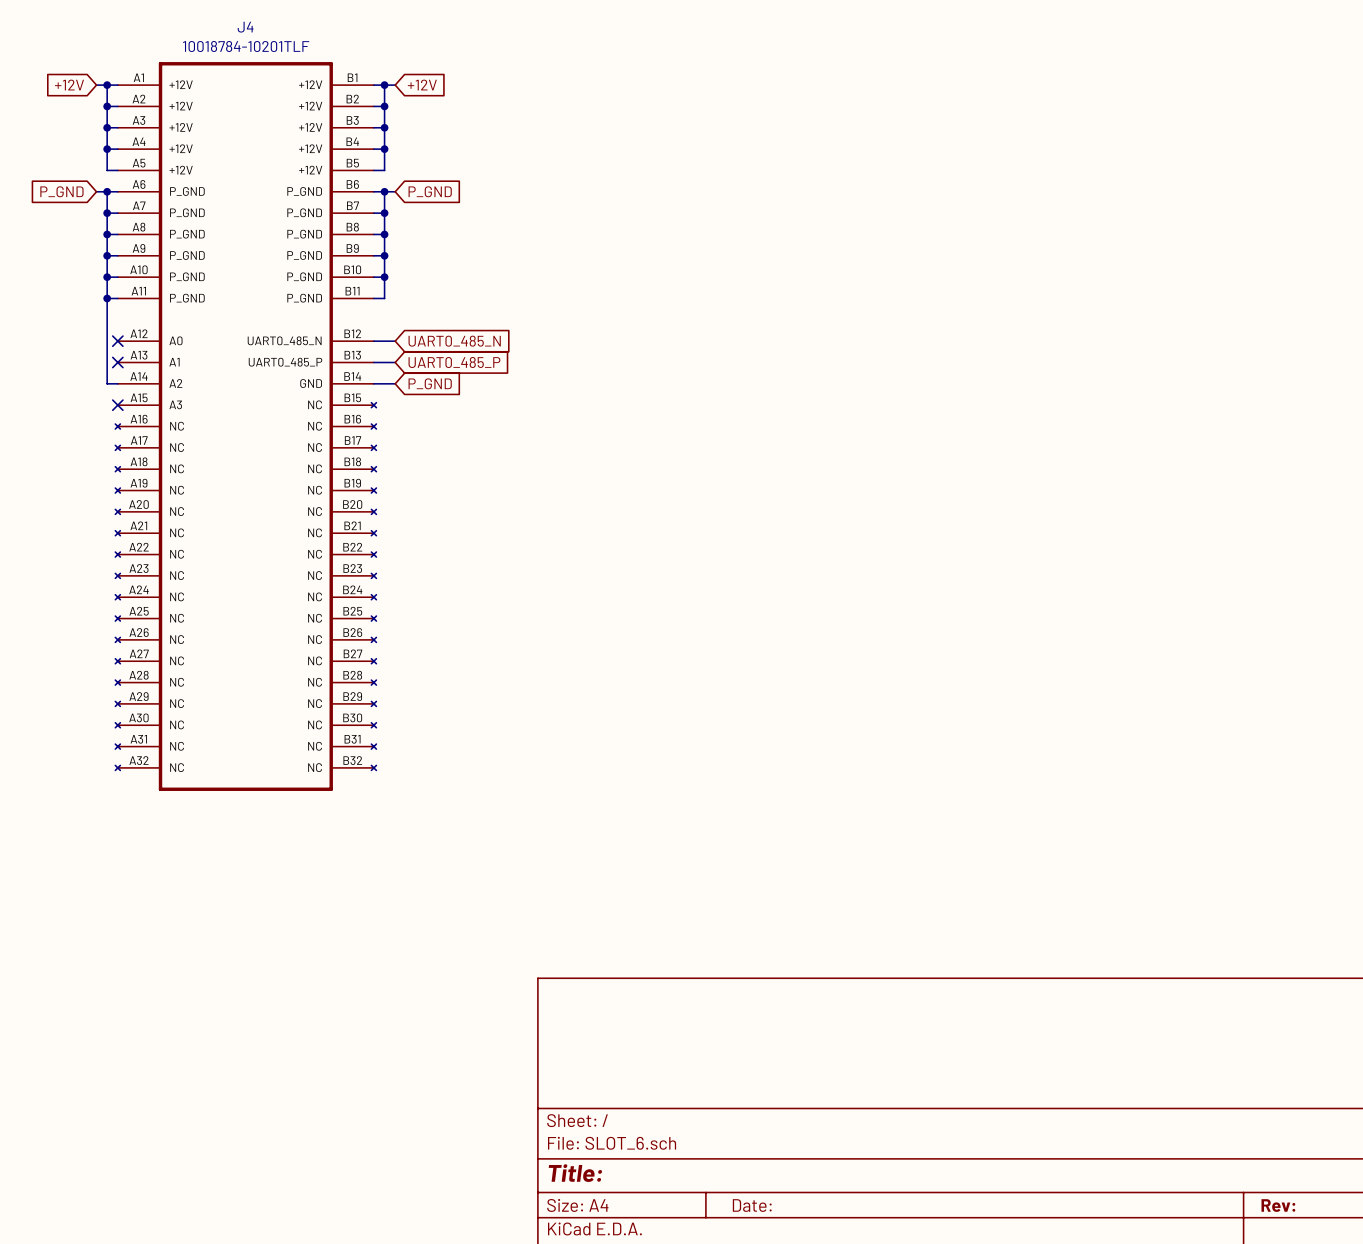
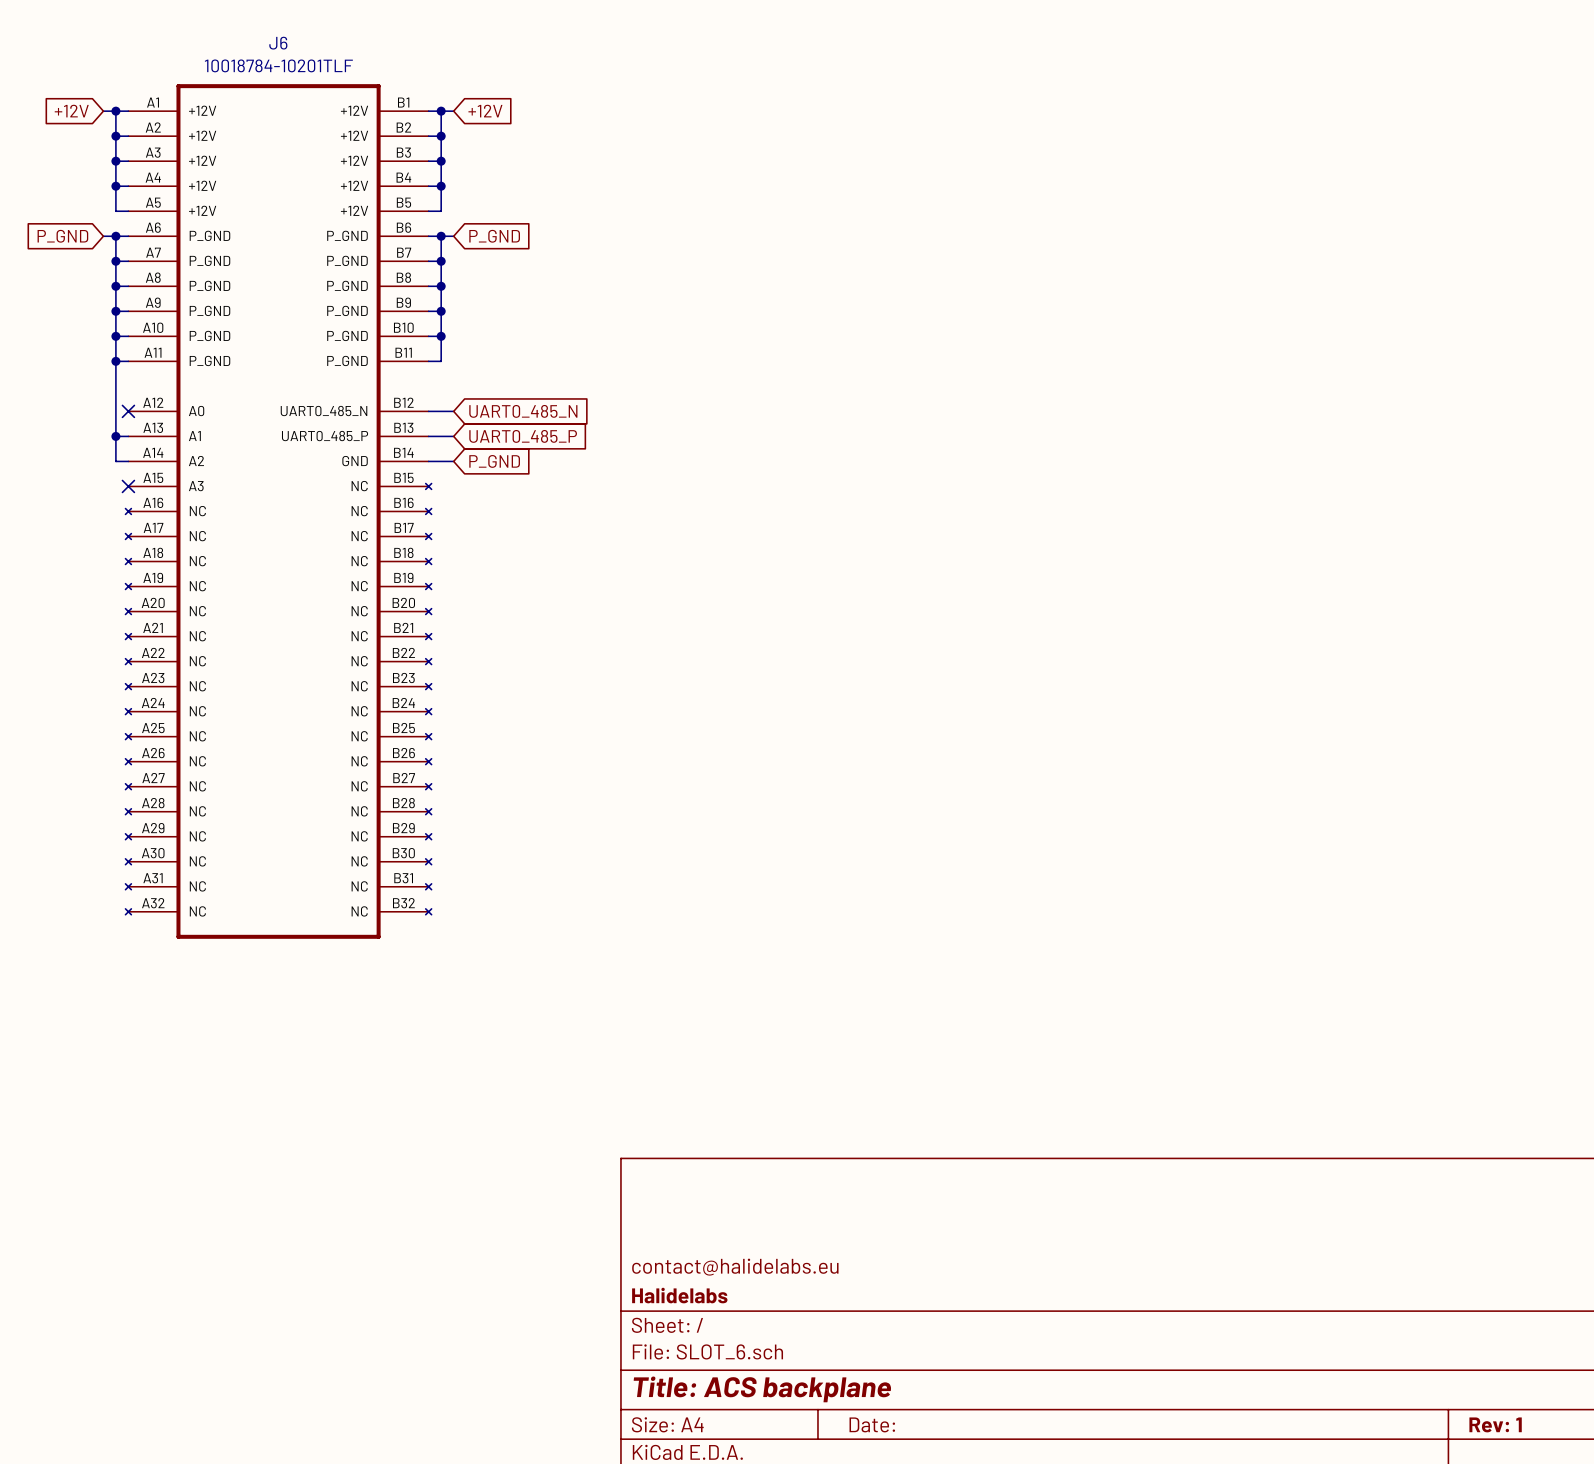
J4 name: J4 (245, 27) -> J6 (278, 43)
wire: none -> (115, 436) (128, 436)
junction: none -> (115, 436)
no-connect mark: (117, 362) -> none
title block: none -> contact@halidelabs.eu (735, 1267)
title block: none -> Halidelabs (679, 1295)
title block: Title: (575, 1173) -> Title: ACS backplane (762, 1389)
title block: Rev: (1278, 1205) -> Rev: 1 (1495, 1424)

